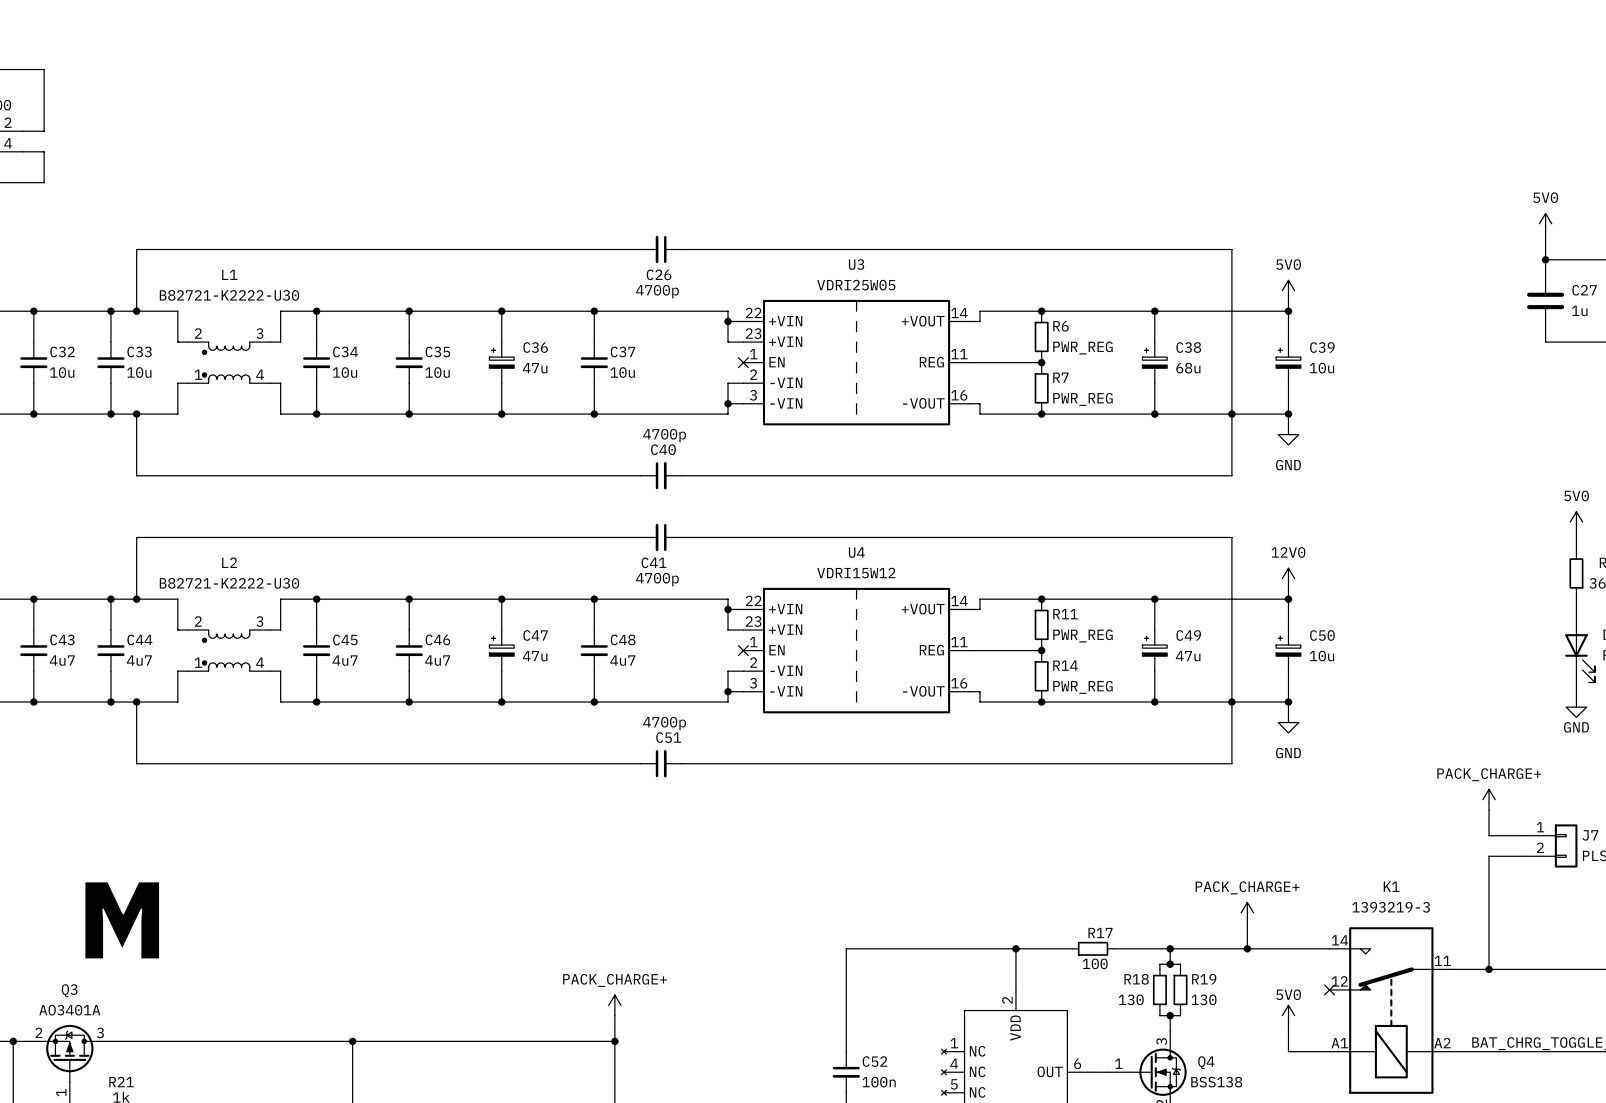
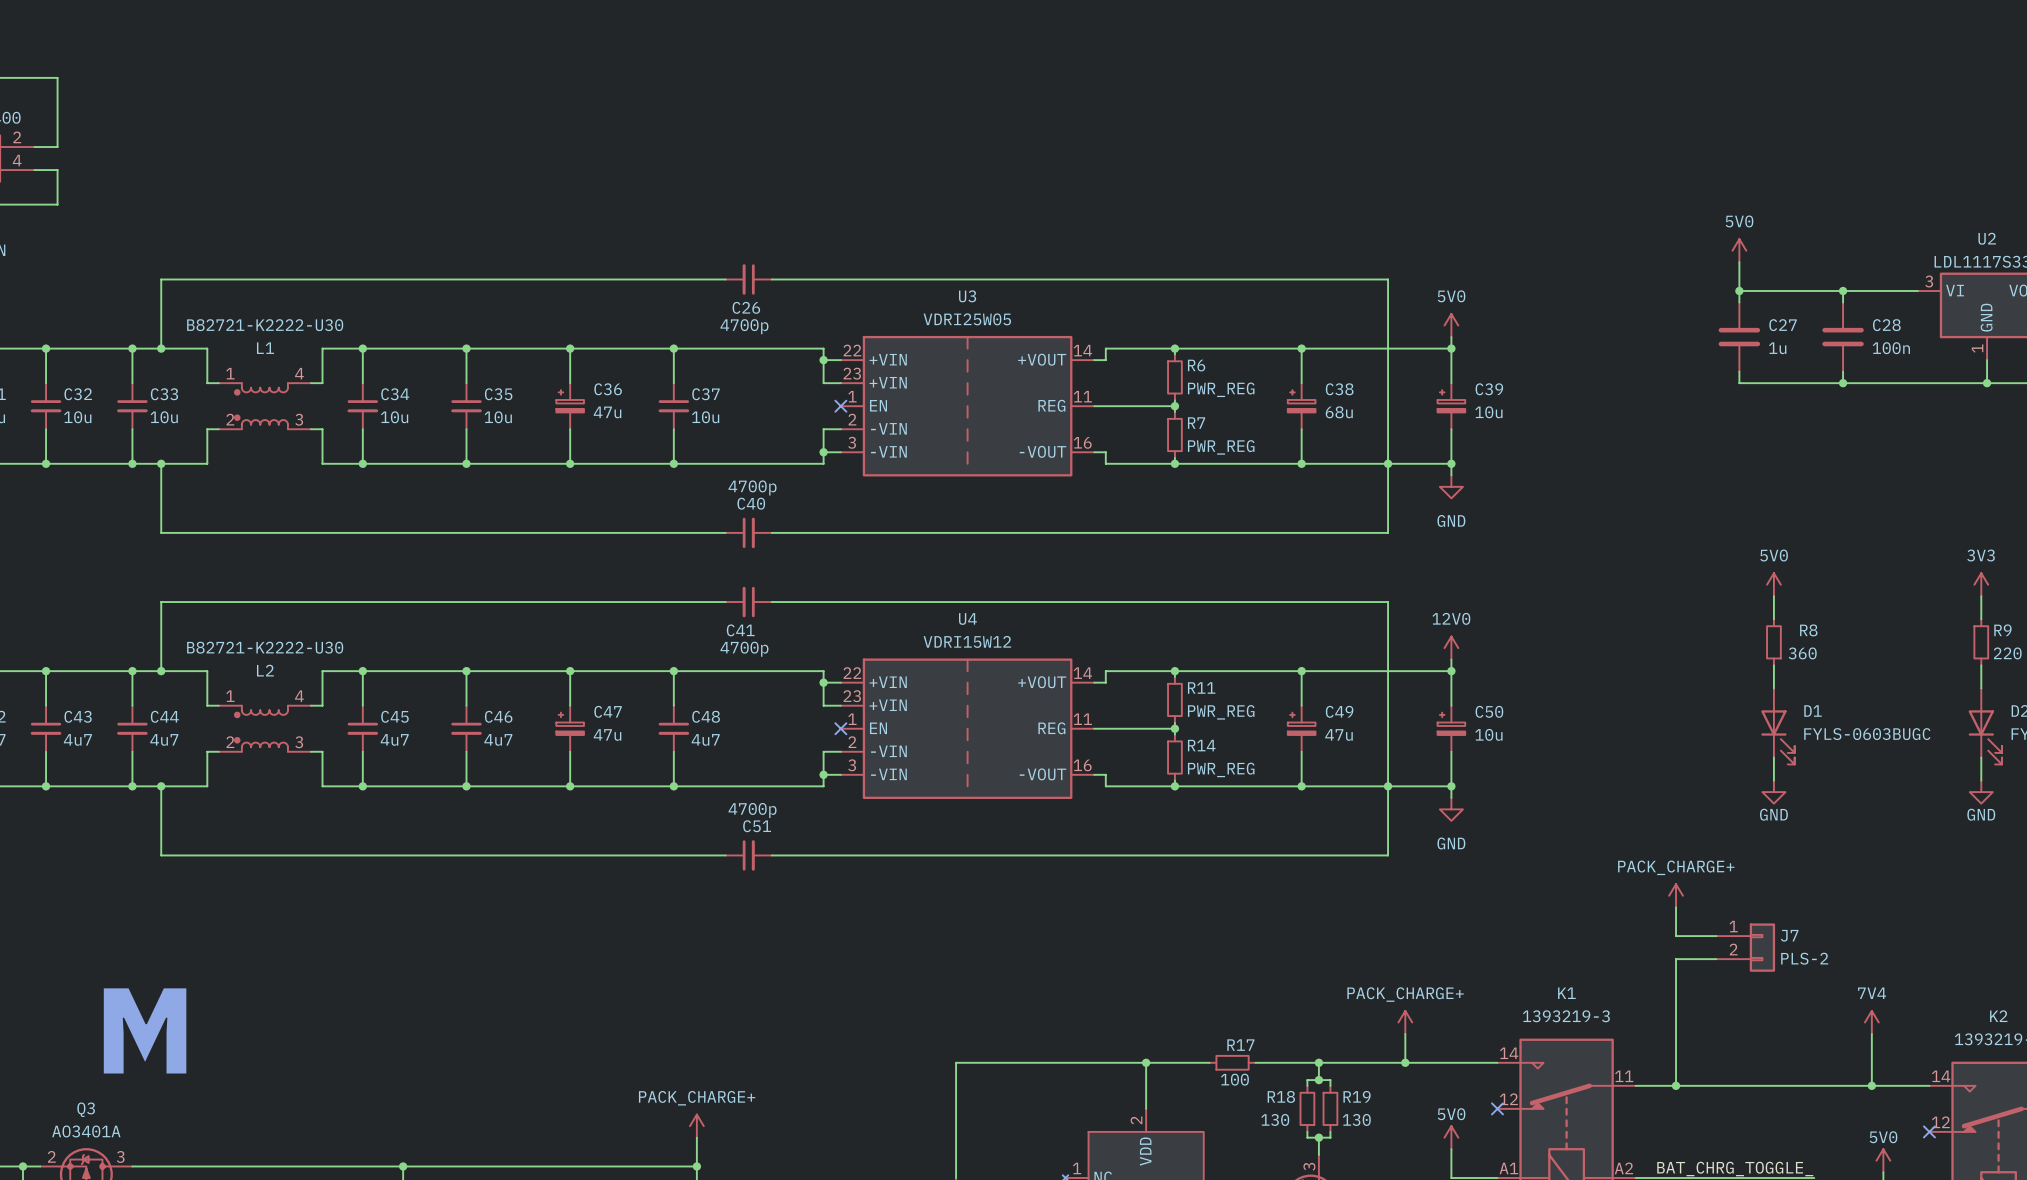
L1 name position: L1 (229, 274) -> L1 (265, 348)
L1 flip: as is (226, 362) -> up-down (261, 406)
L2 name position: L2 (229, 562) -> L2 (265, 670)
L2 flip: as is (226, 650) -> up-down (261, 728)

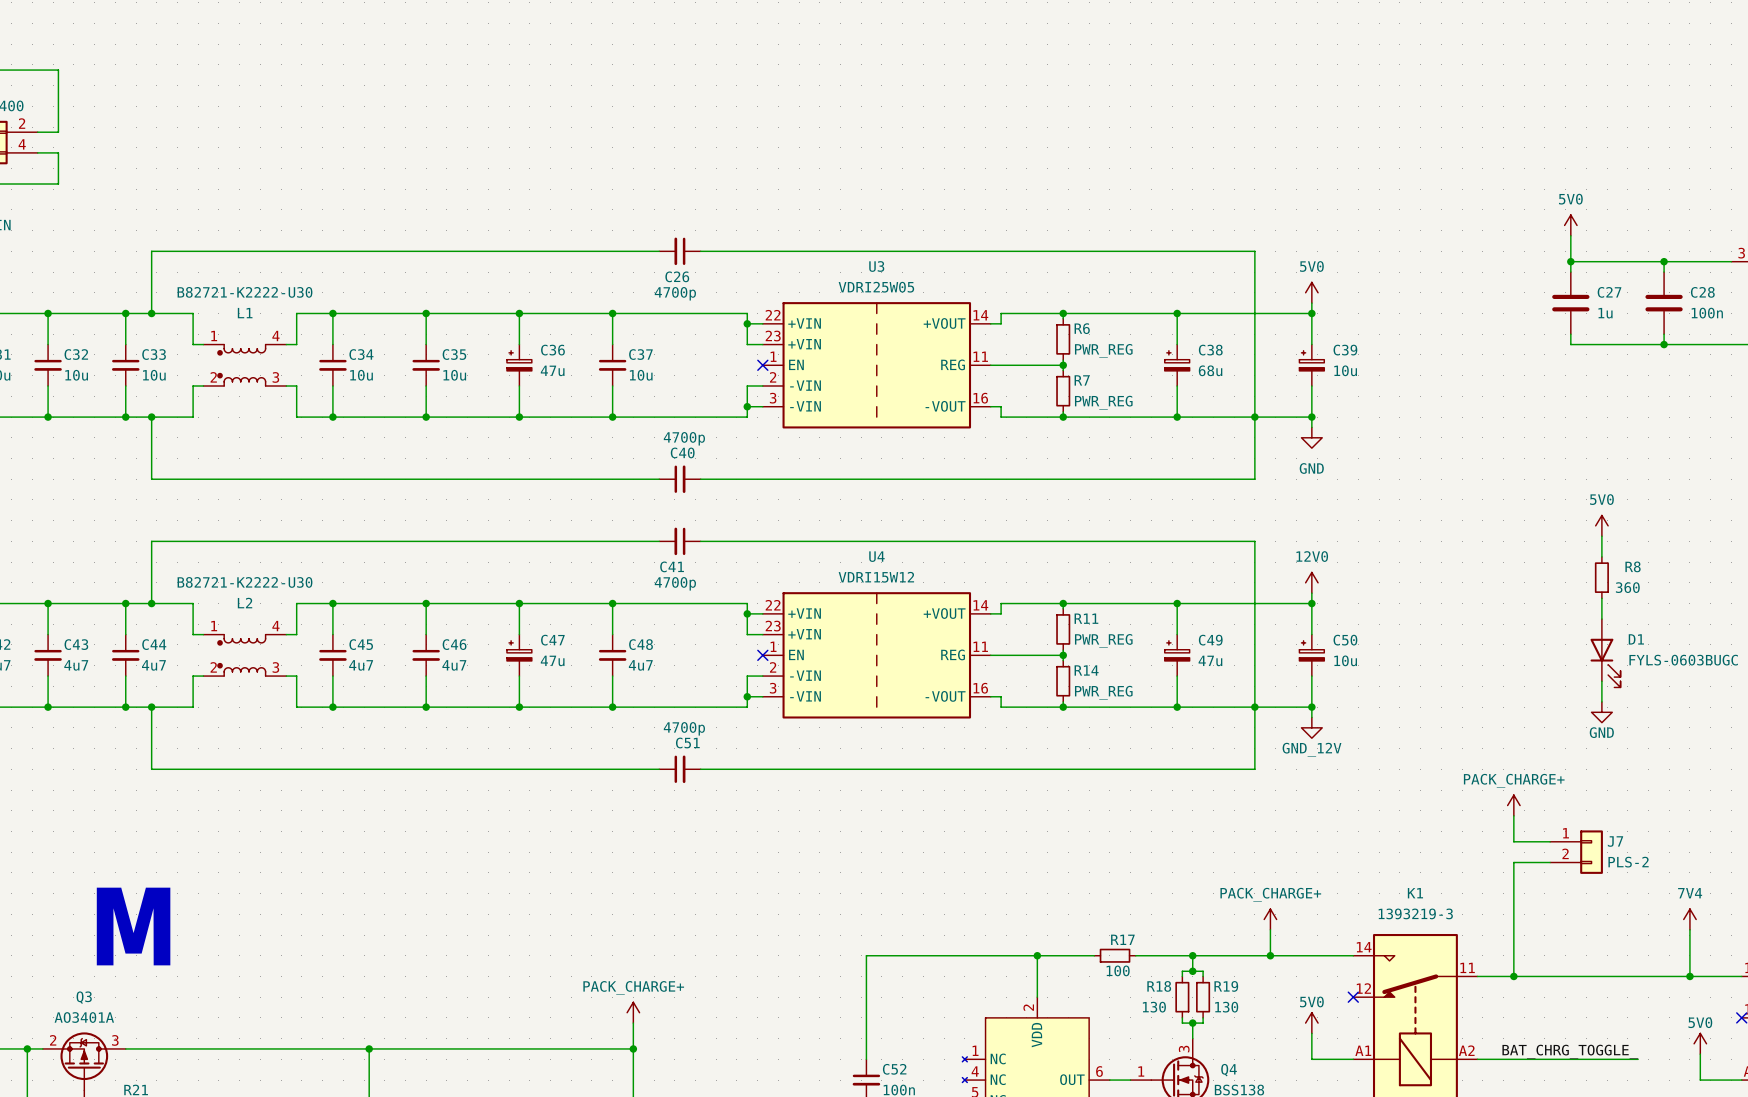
power symbol: GND (1451, 809) -> GND_12V (1311, 727)

